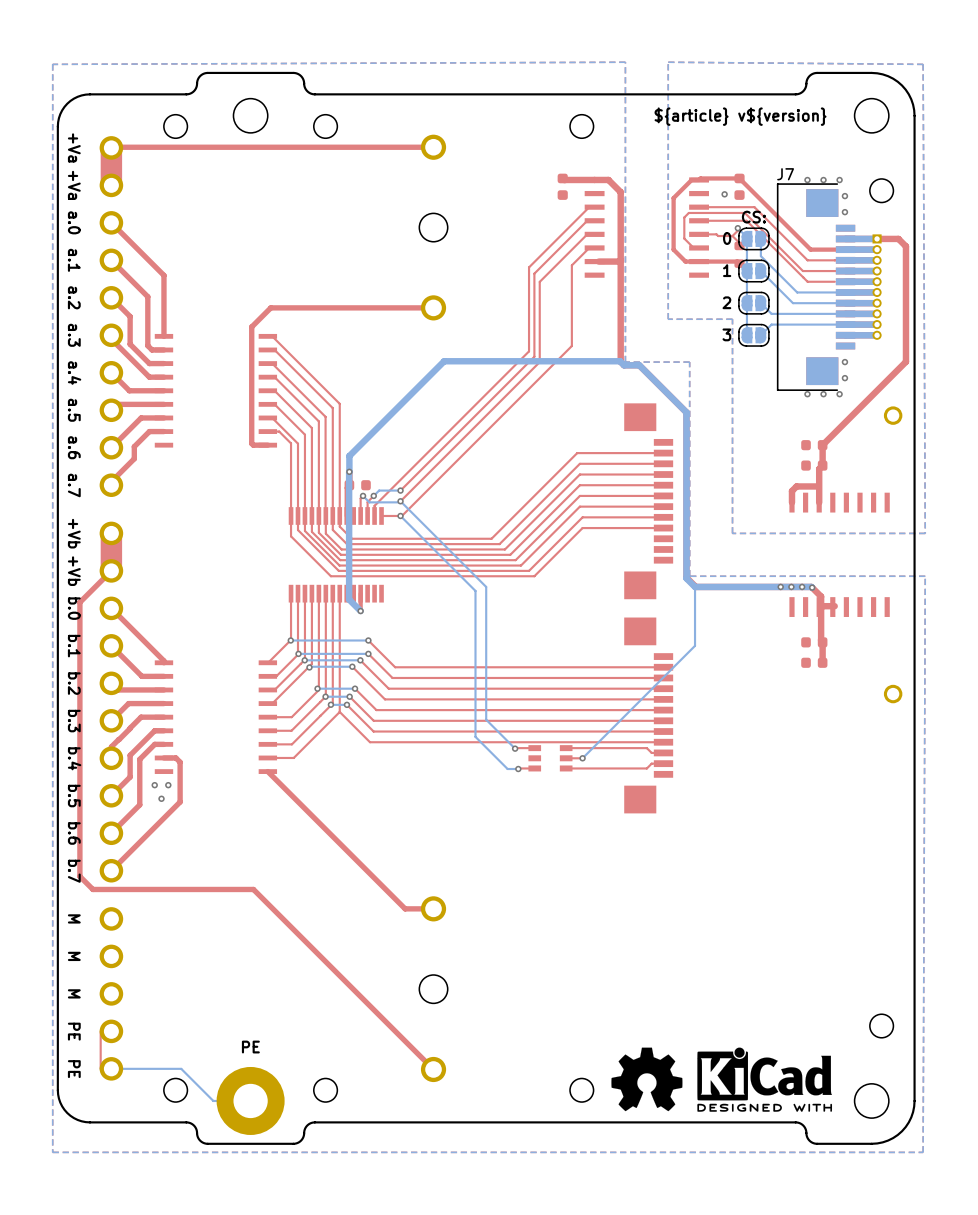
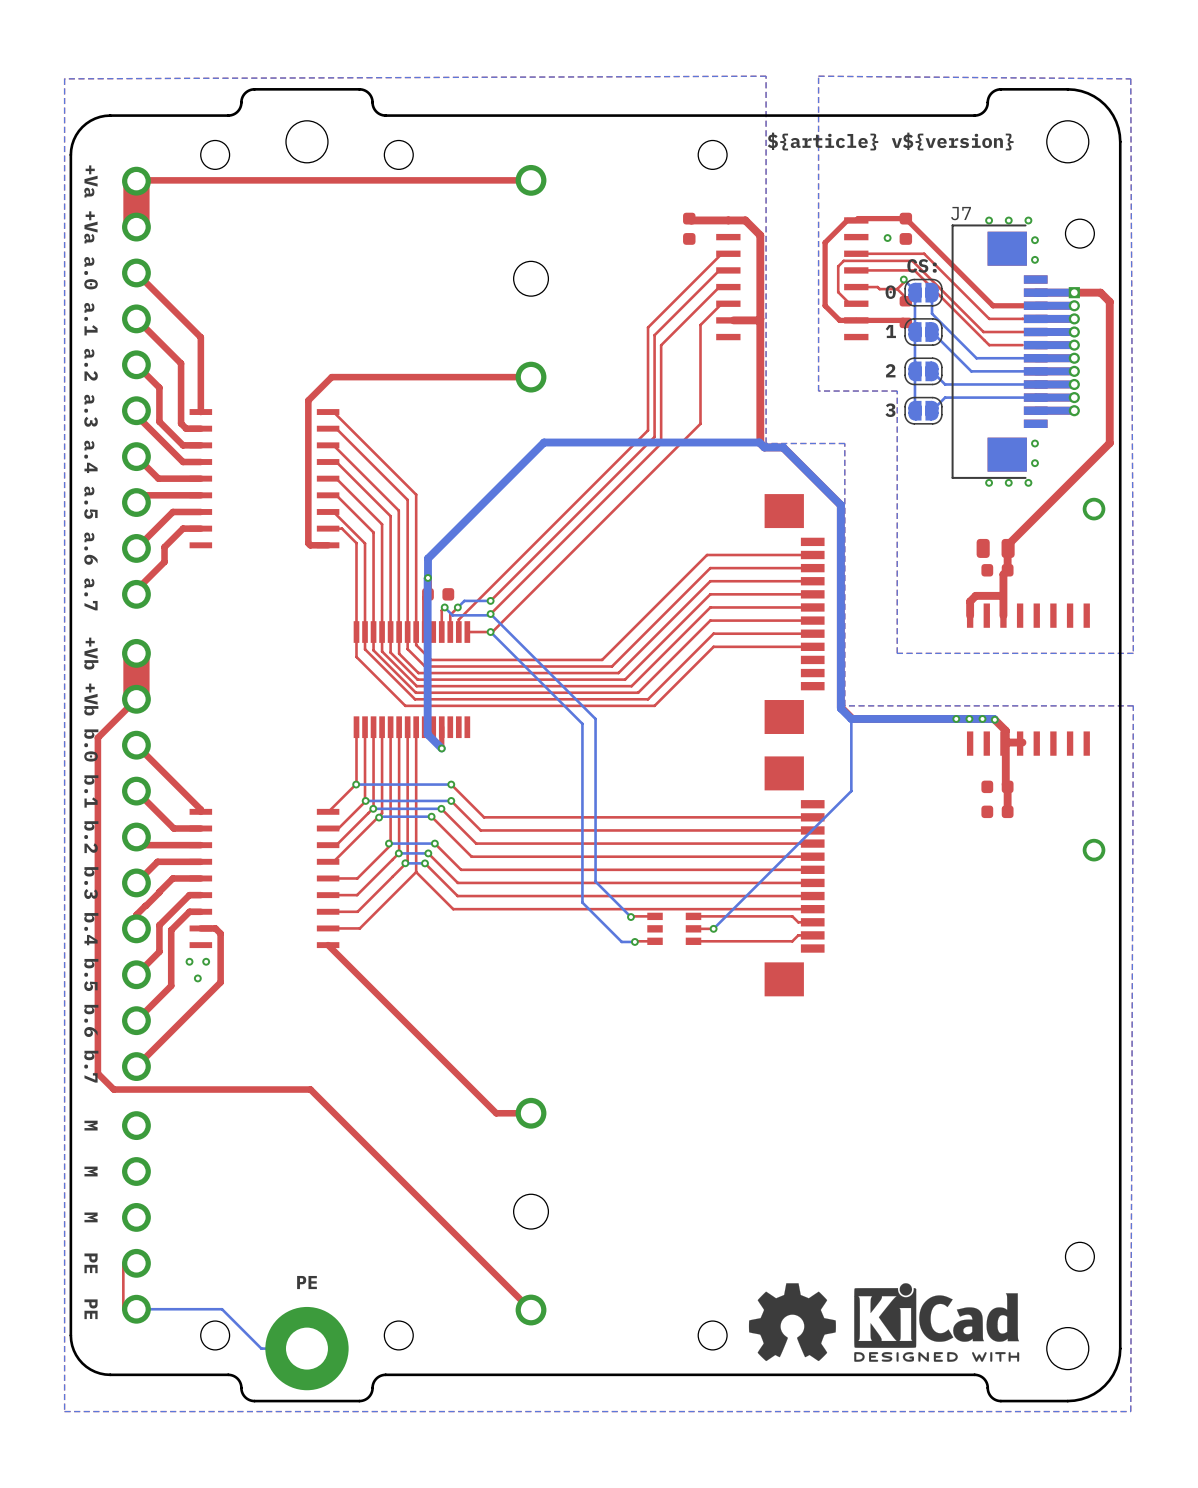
part footprint: [801, 440, 828, 451] -> [976, 538, 1015, 558]

